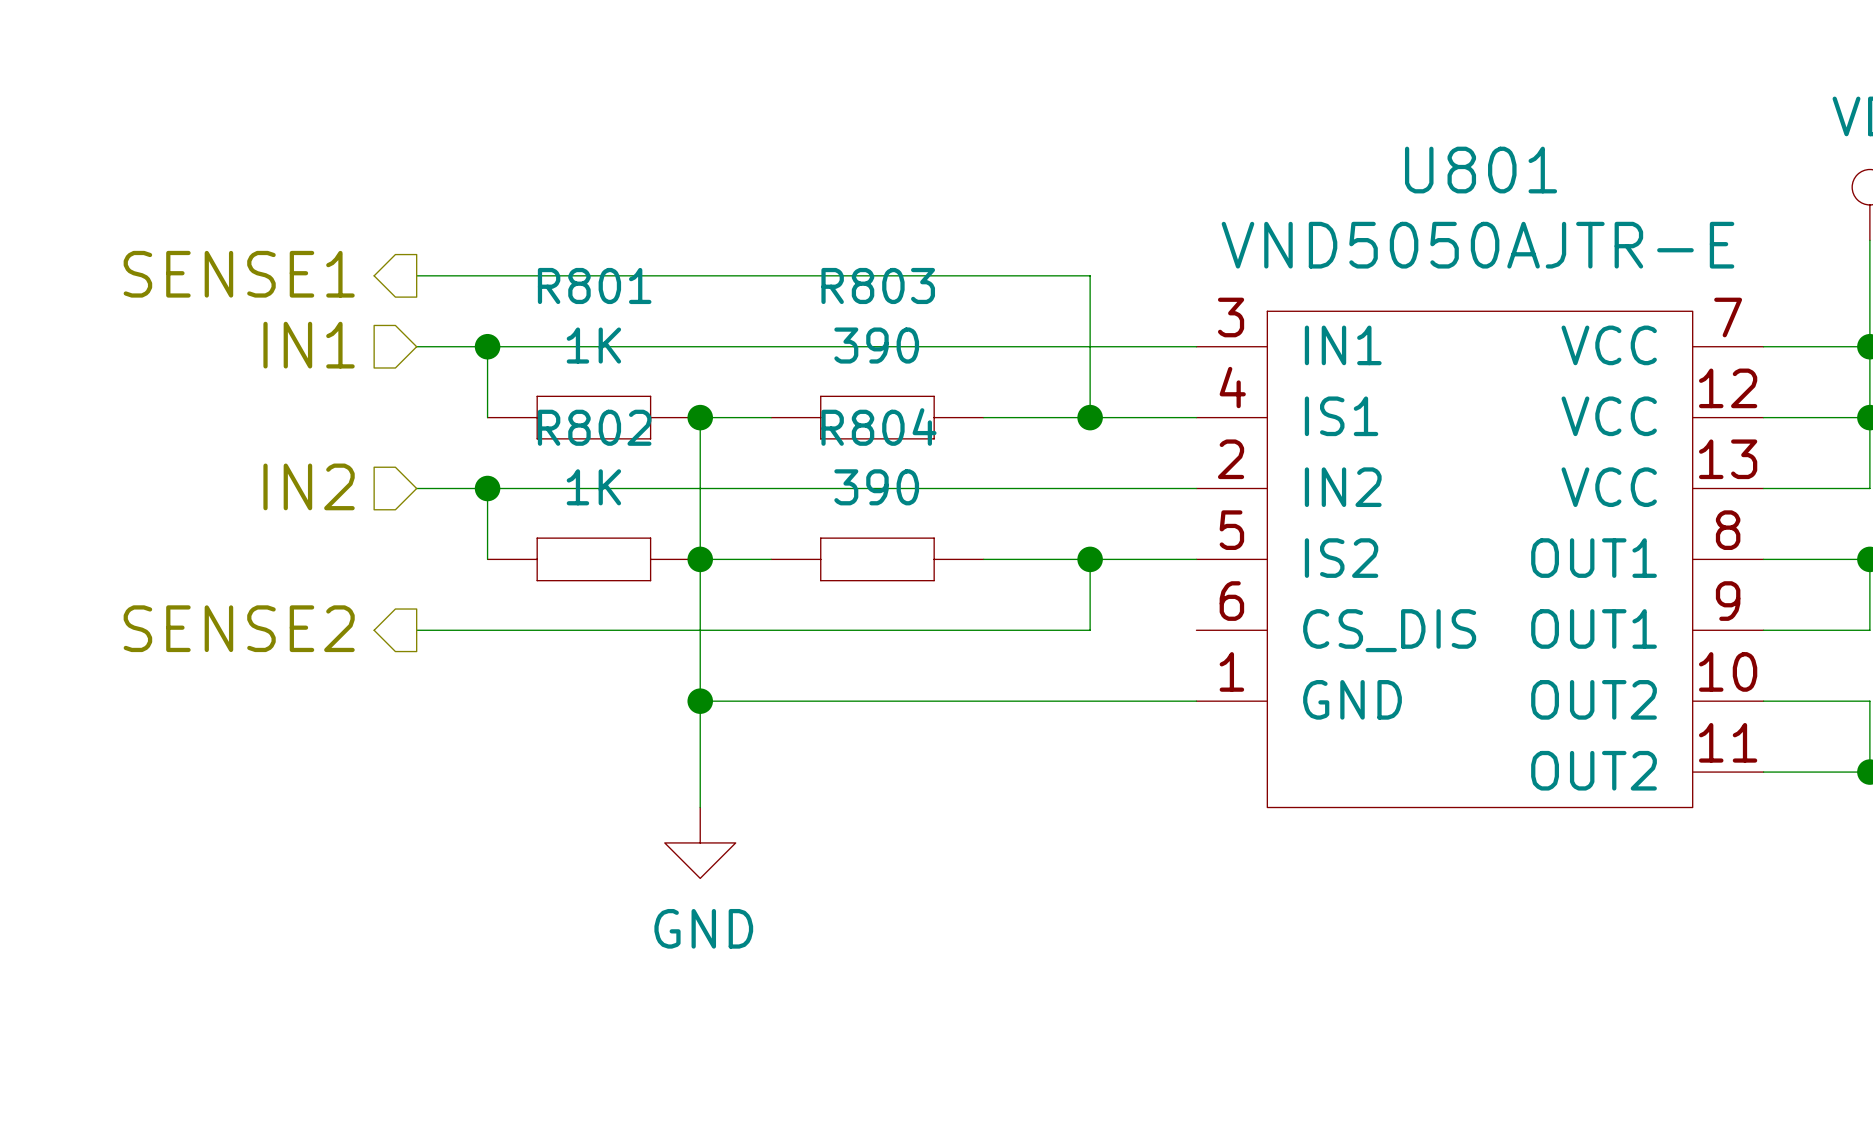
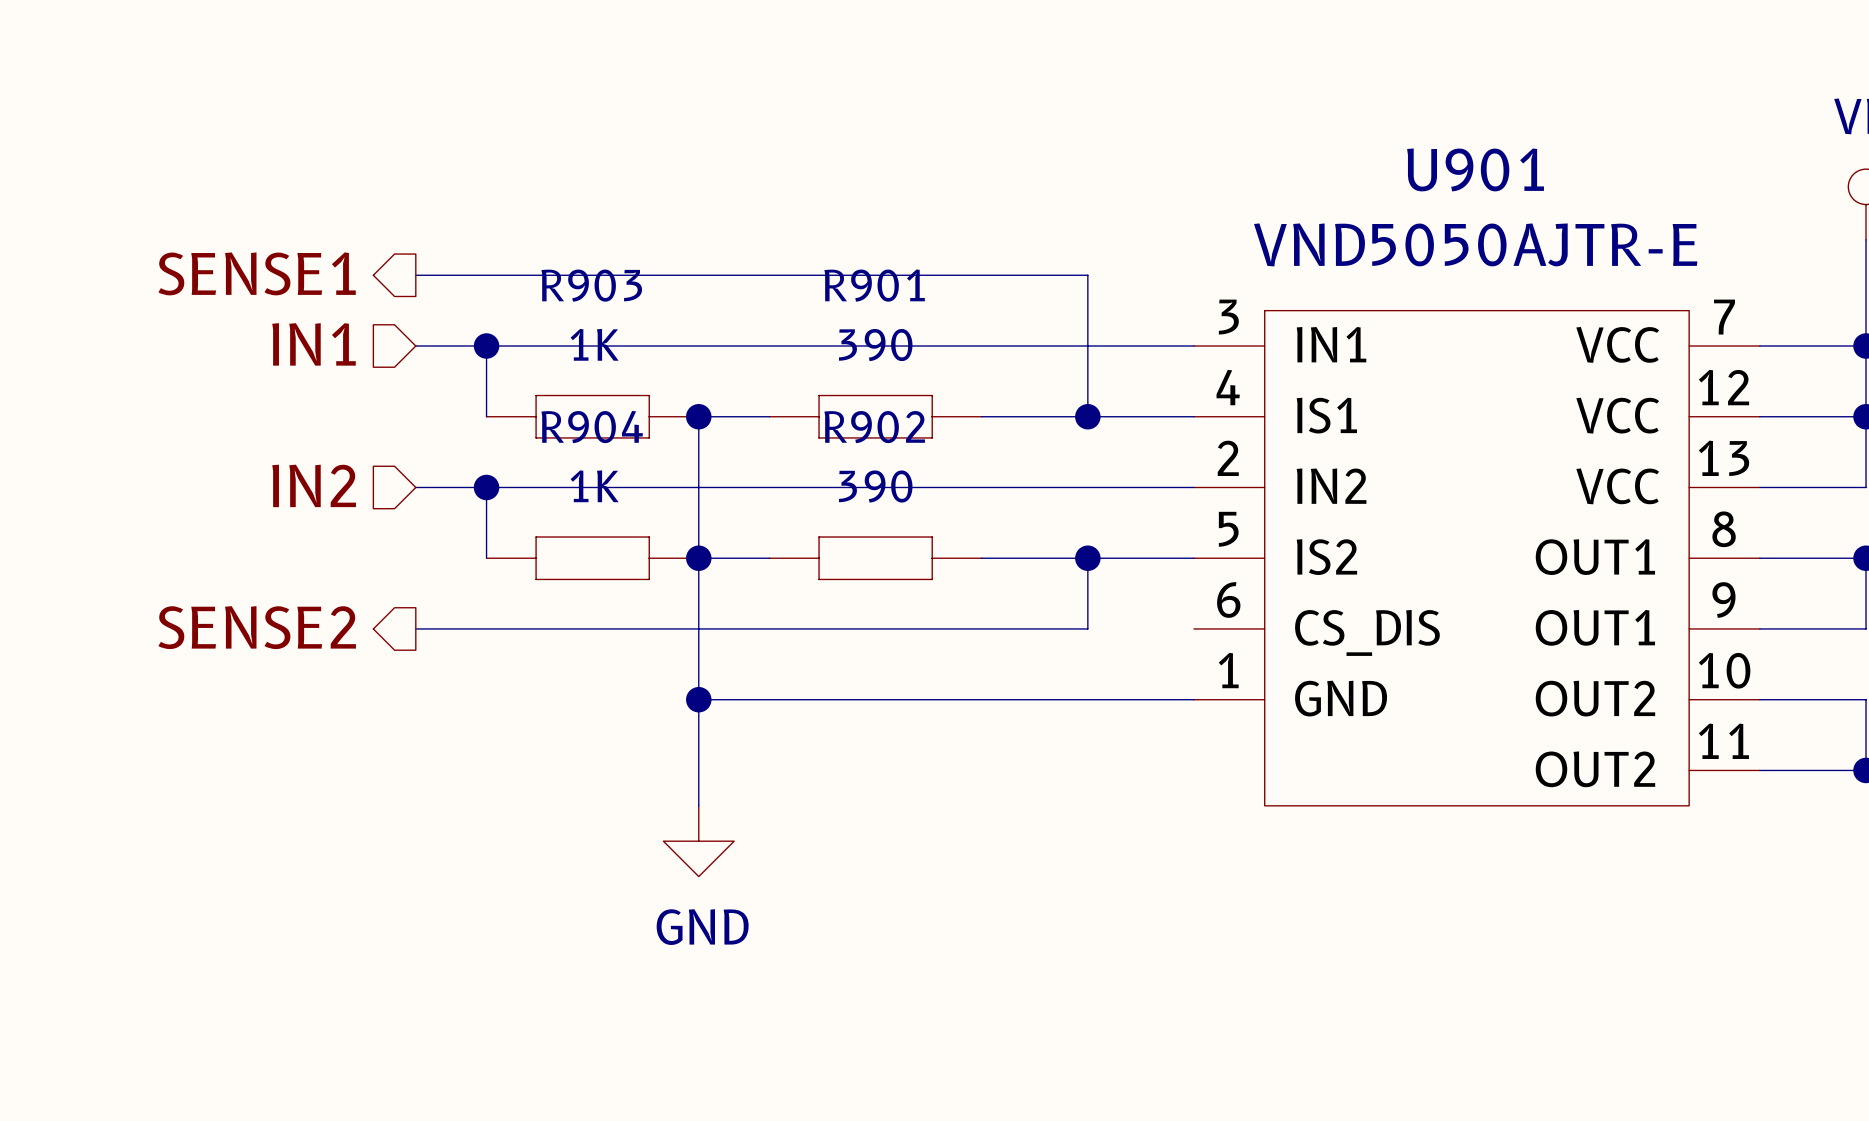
U801 name: U801 (1481, 170) -> U901 (1475, 169)
R801 name: R801 (594, 285) -> R903 (591, 285)
R803 name: R803 (878, 285) -> R901 (874, 285)
R802 name: R802 (594, 427) -> R904 (592, 427)
R804 name: R804 (878, 427) -> R902 (874, 427)

